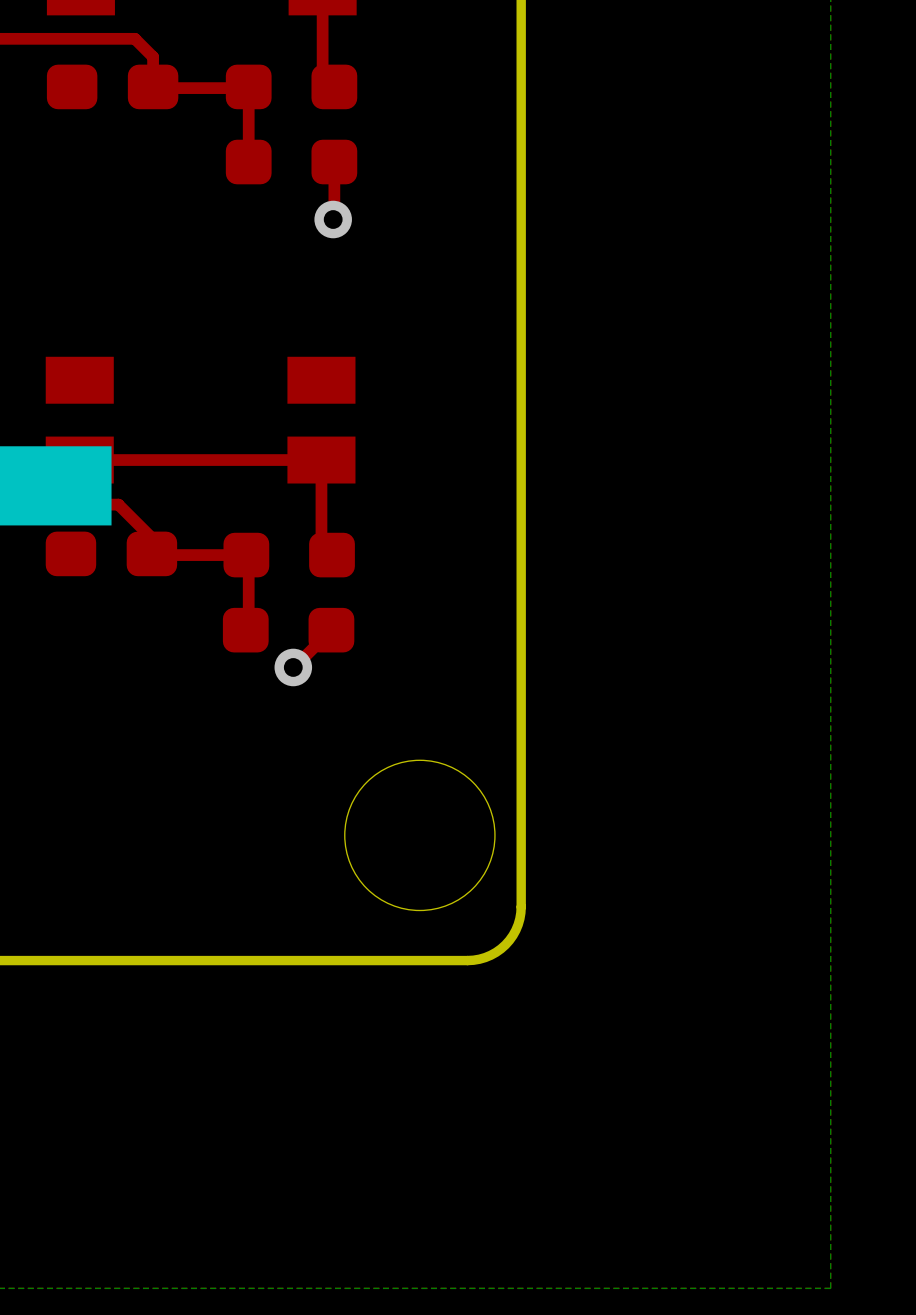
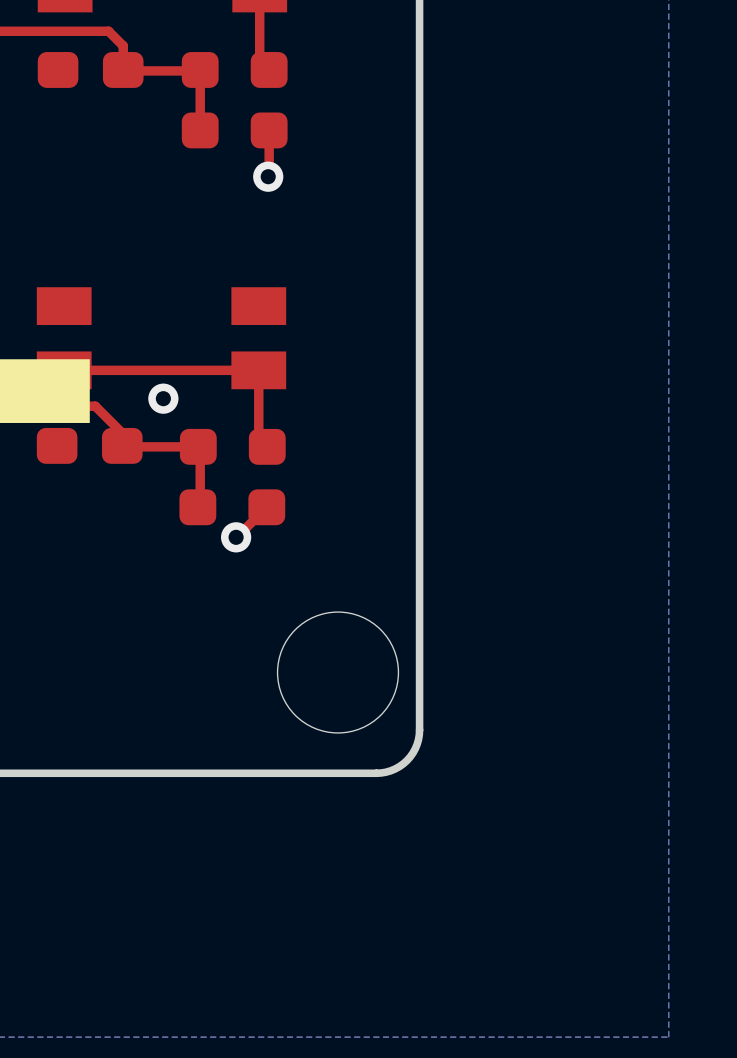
via: none -> (163, 398)

